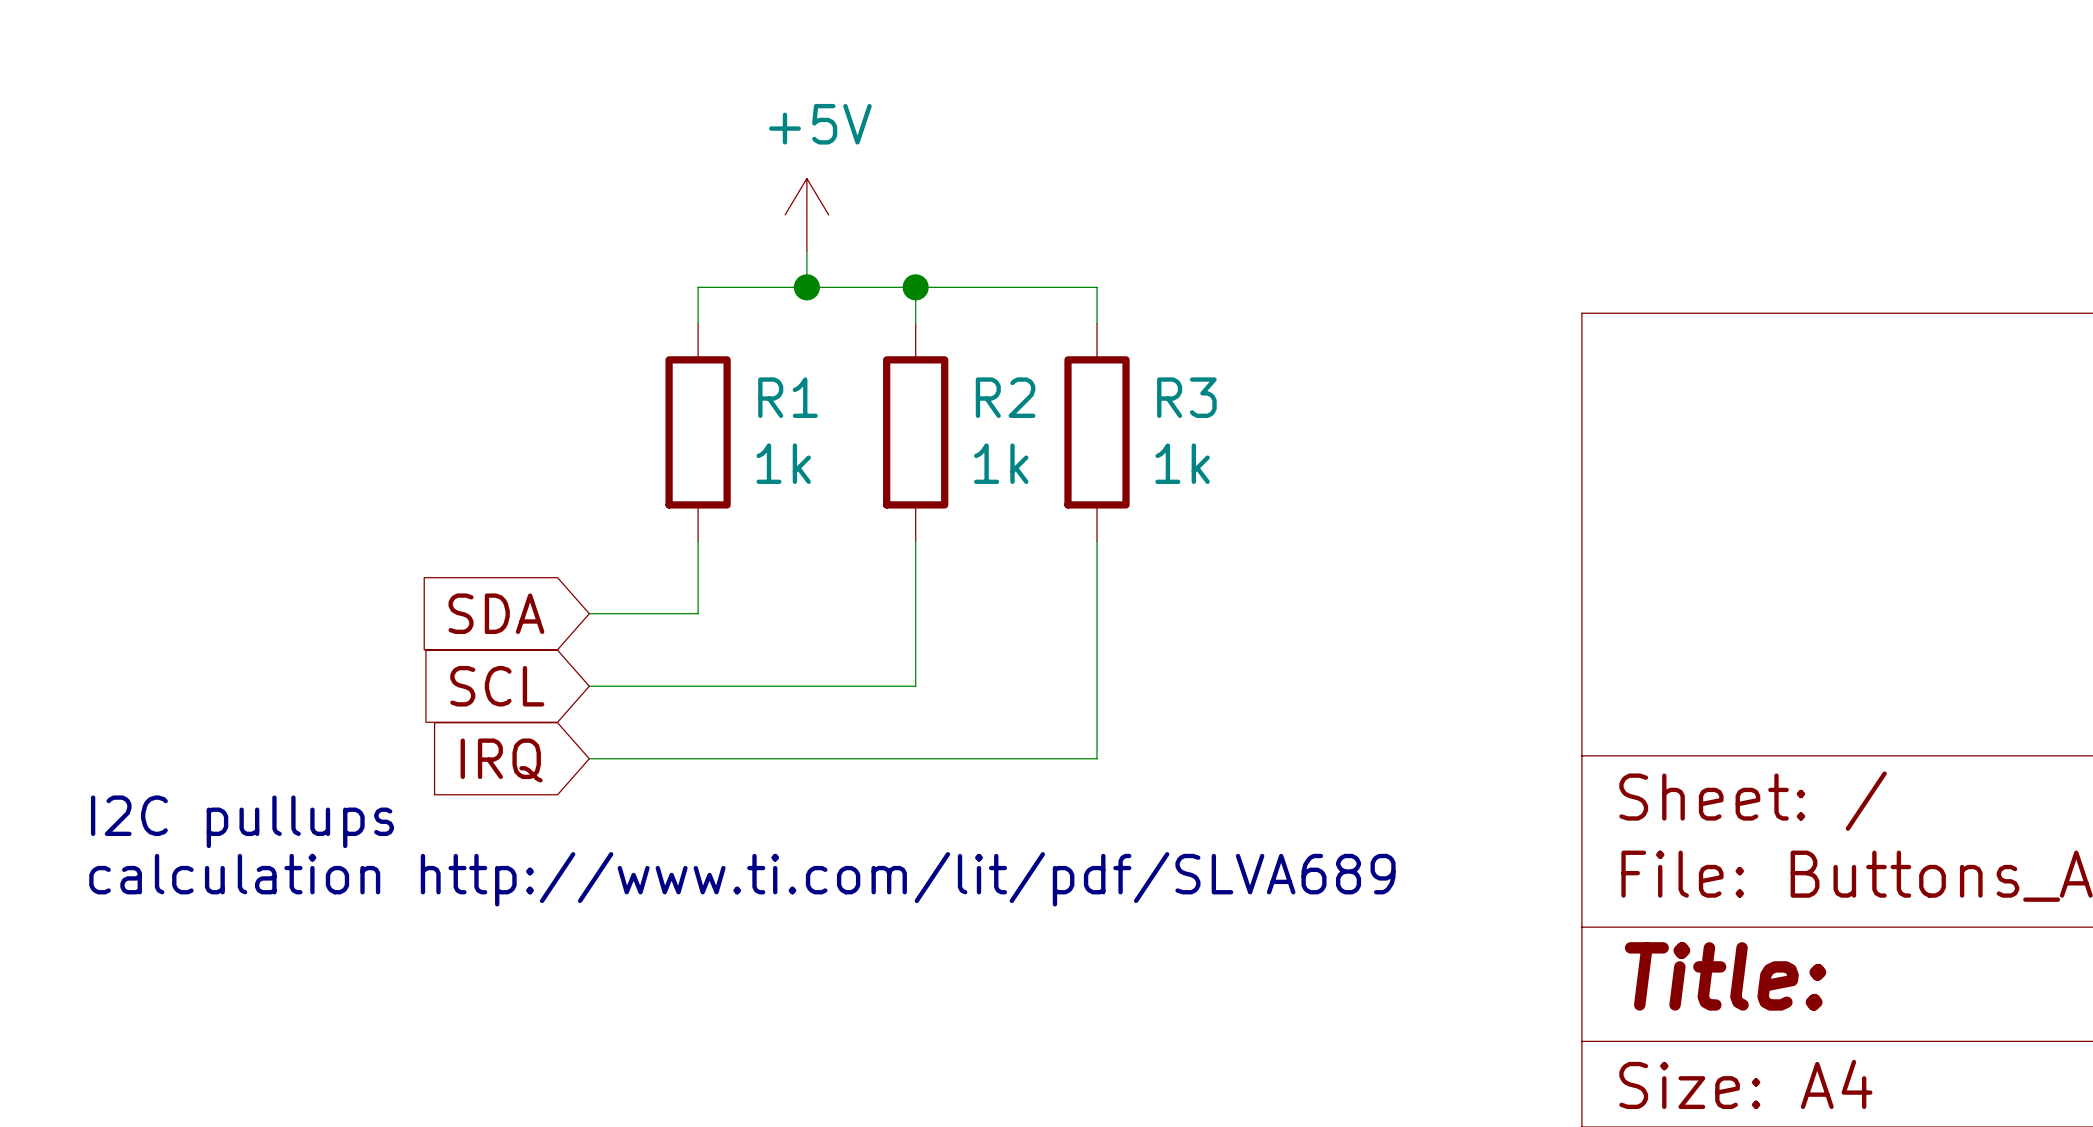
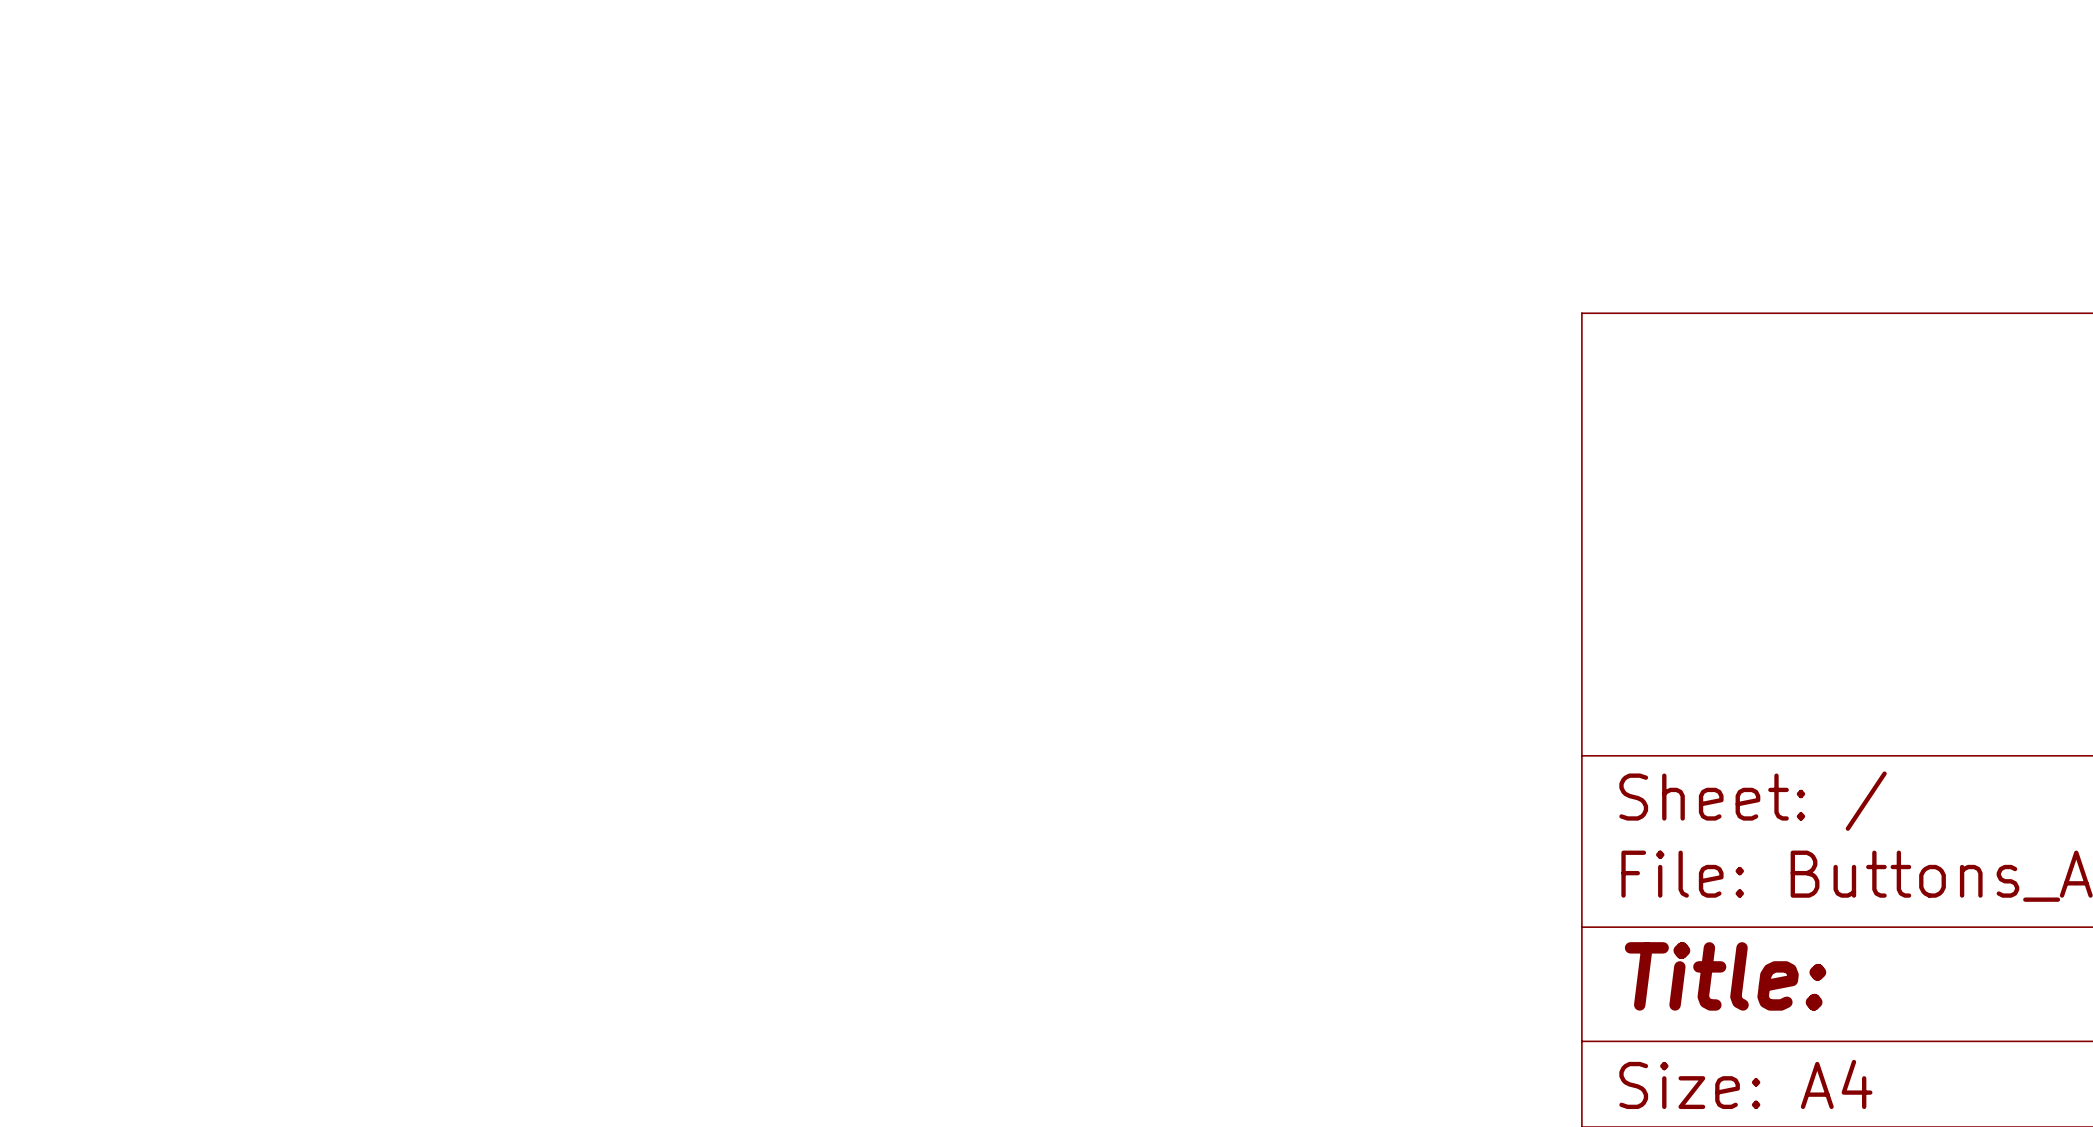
power symbol: +5V (806, 214) -> none
wire: (806, 251) (806, 287) -> none
junction: (806, 287) -> none
wire: (915, 287) (915, 323) -> none
junction: (915, 287) -> none
wire: (698, 323) (698, 287) (1097, 287) (1097, 323) -> none
R1: 1k (698, 432) -> none
R2: 1k (915, 432) -> none
R3: 1k (1097, 432) -> none
wire: (698, 541) (698, 613) (589, 613) -> none
wire: (915, 541) (915, 686) (589, 686) -> none
wire: (1097, 541) (1097, 758) (589, 758) -> none
global label: SDA (496, 613) -> none
global label: SCL (497, 686) -> none
global label: IRQ (501, 760) -> none
text: I2C pullups (242, 821) -> none
text: calculation http://www.ti.com/lit/pdf/SLVA689 (742, 879) -> none

